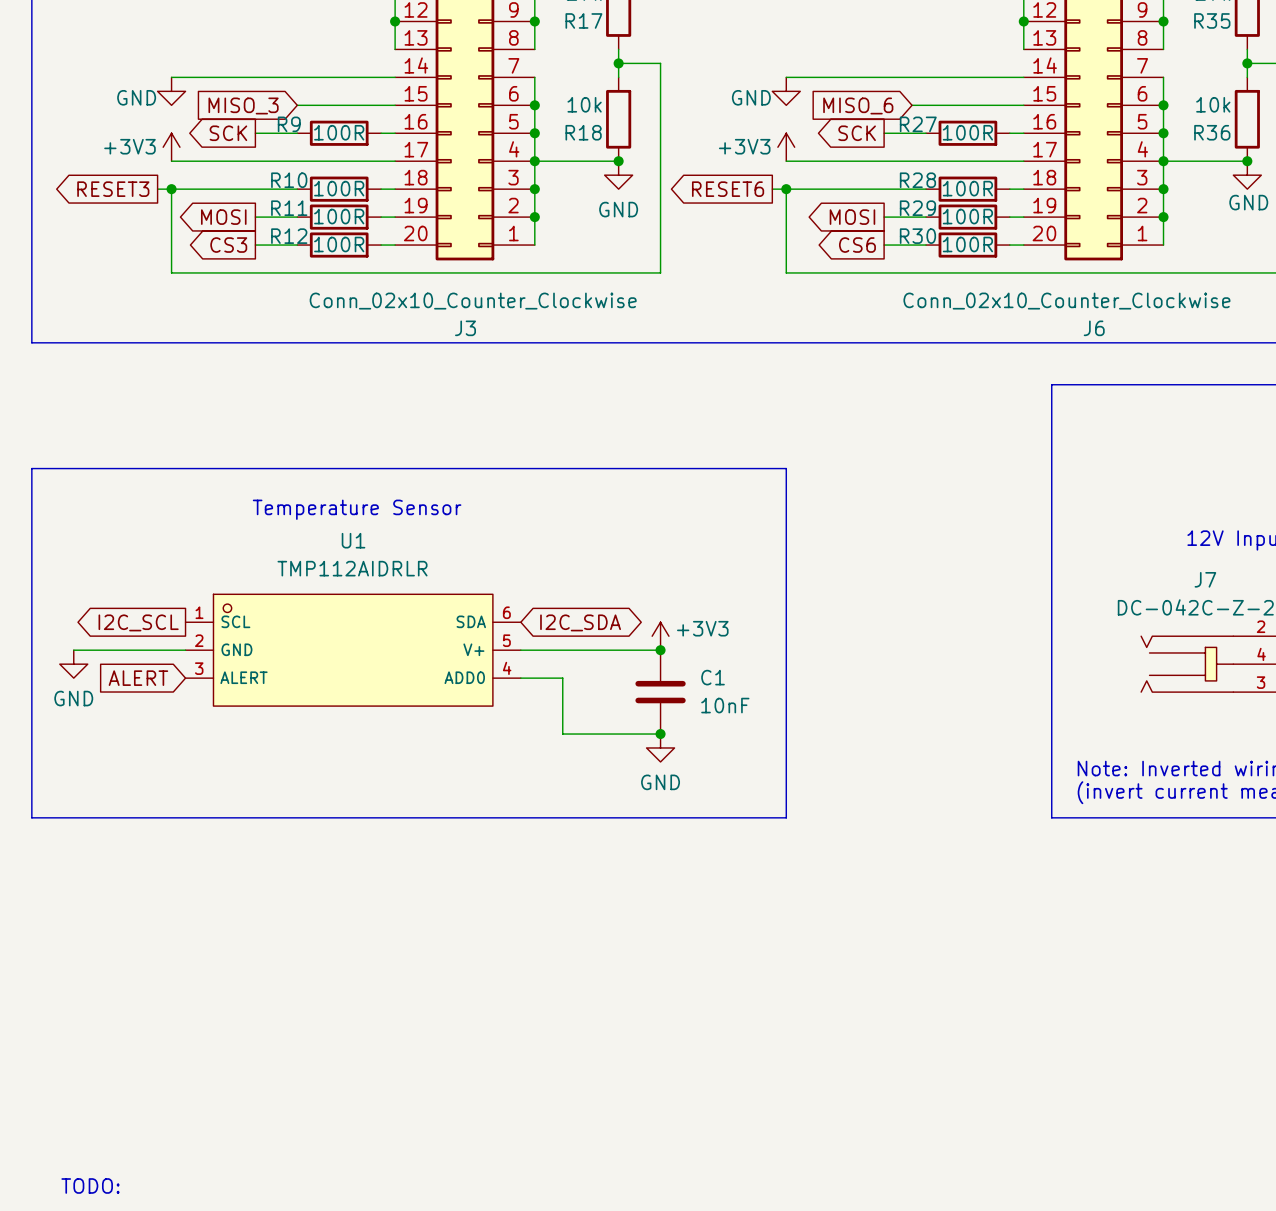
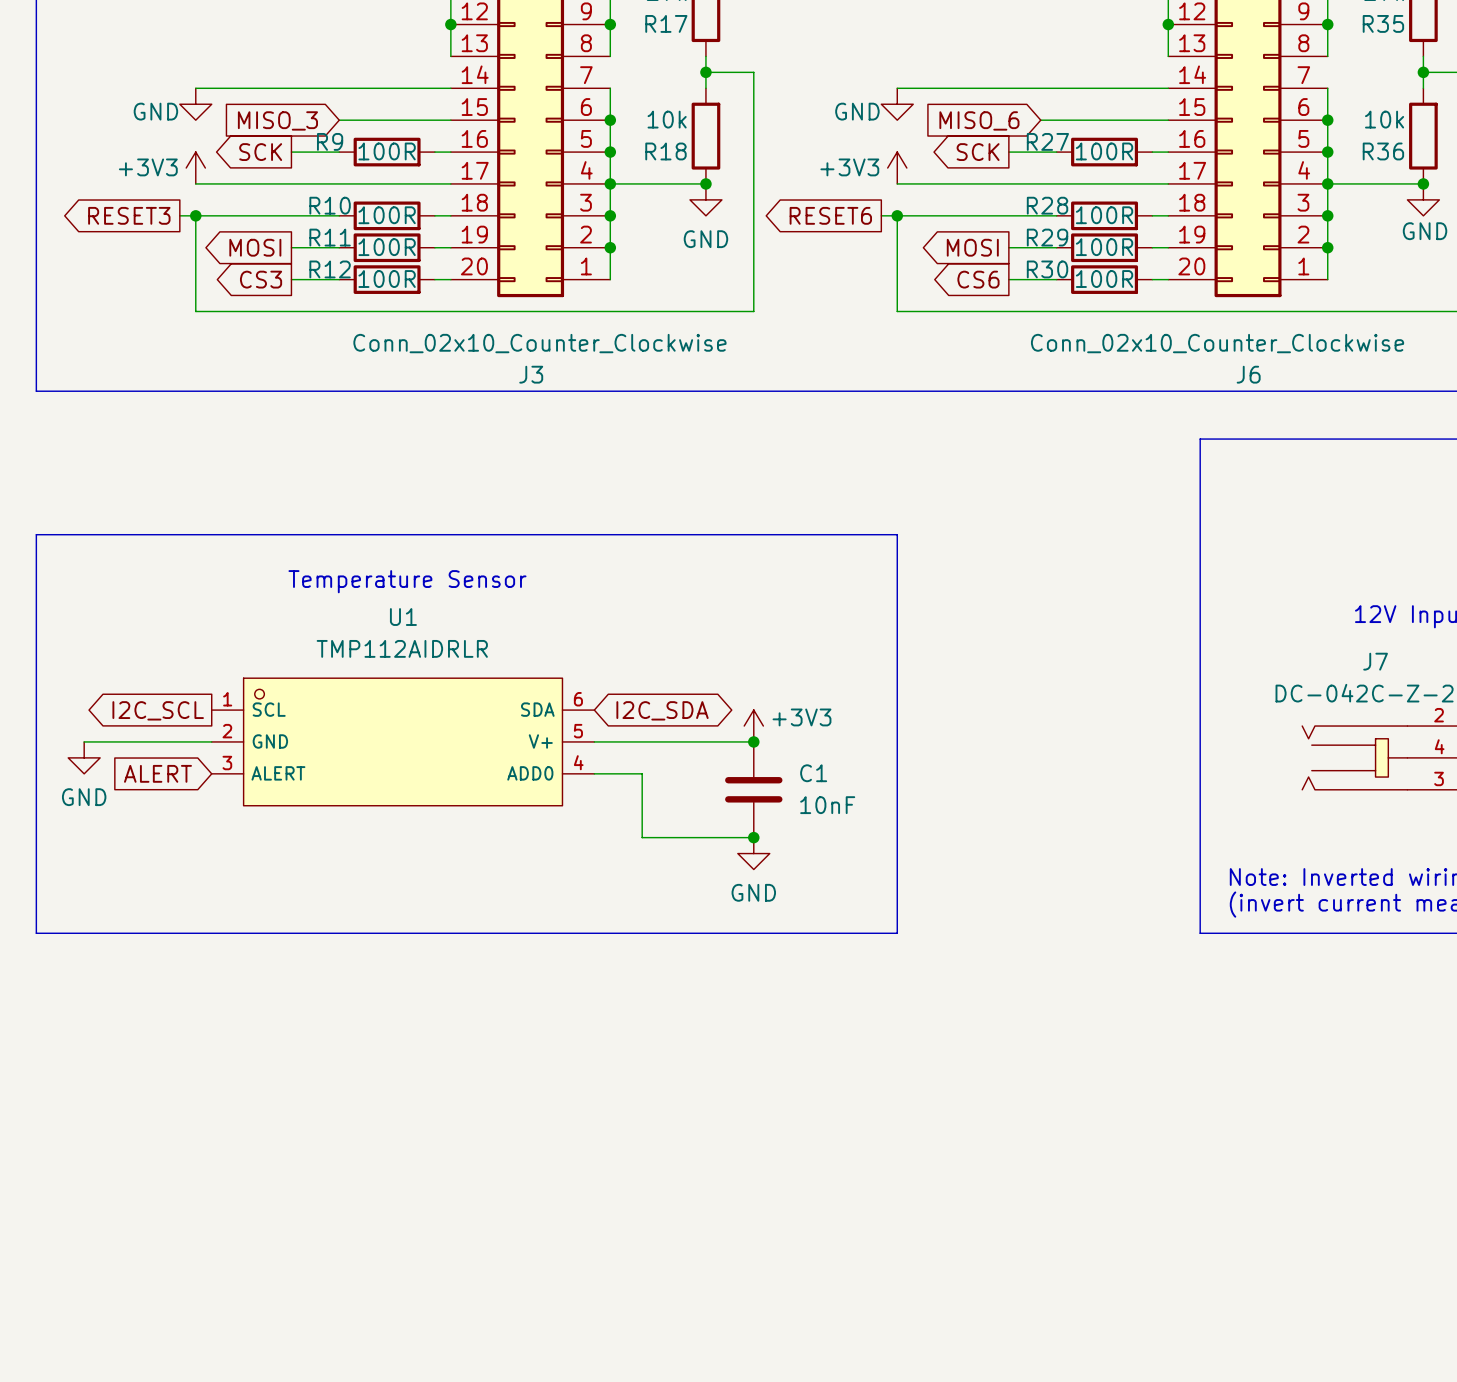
text: TODO: (90, 1185) -> none

